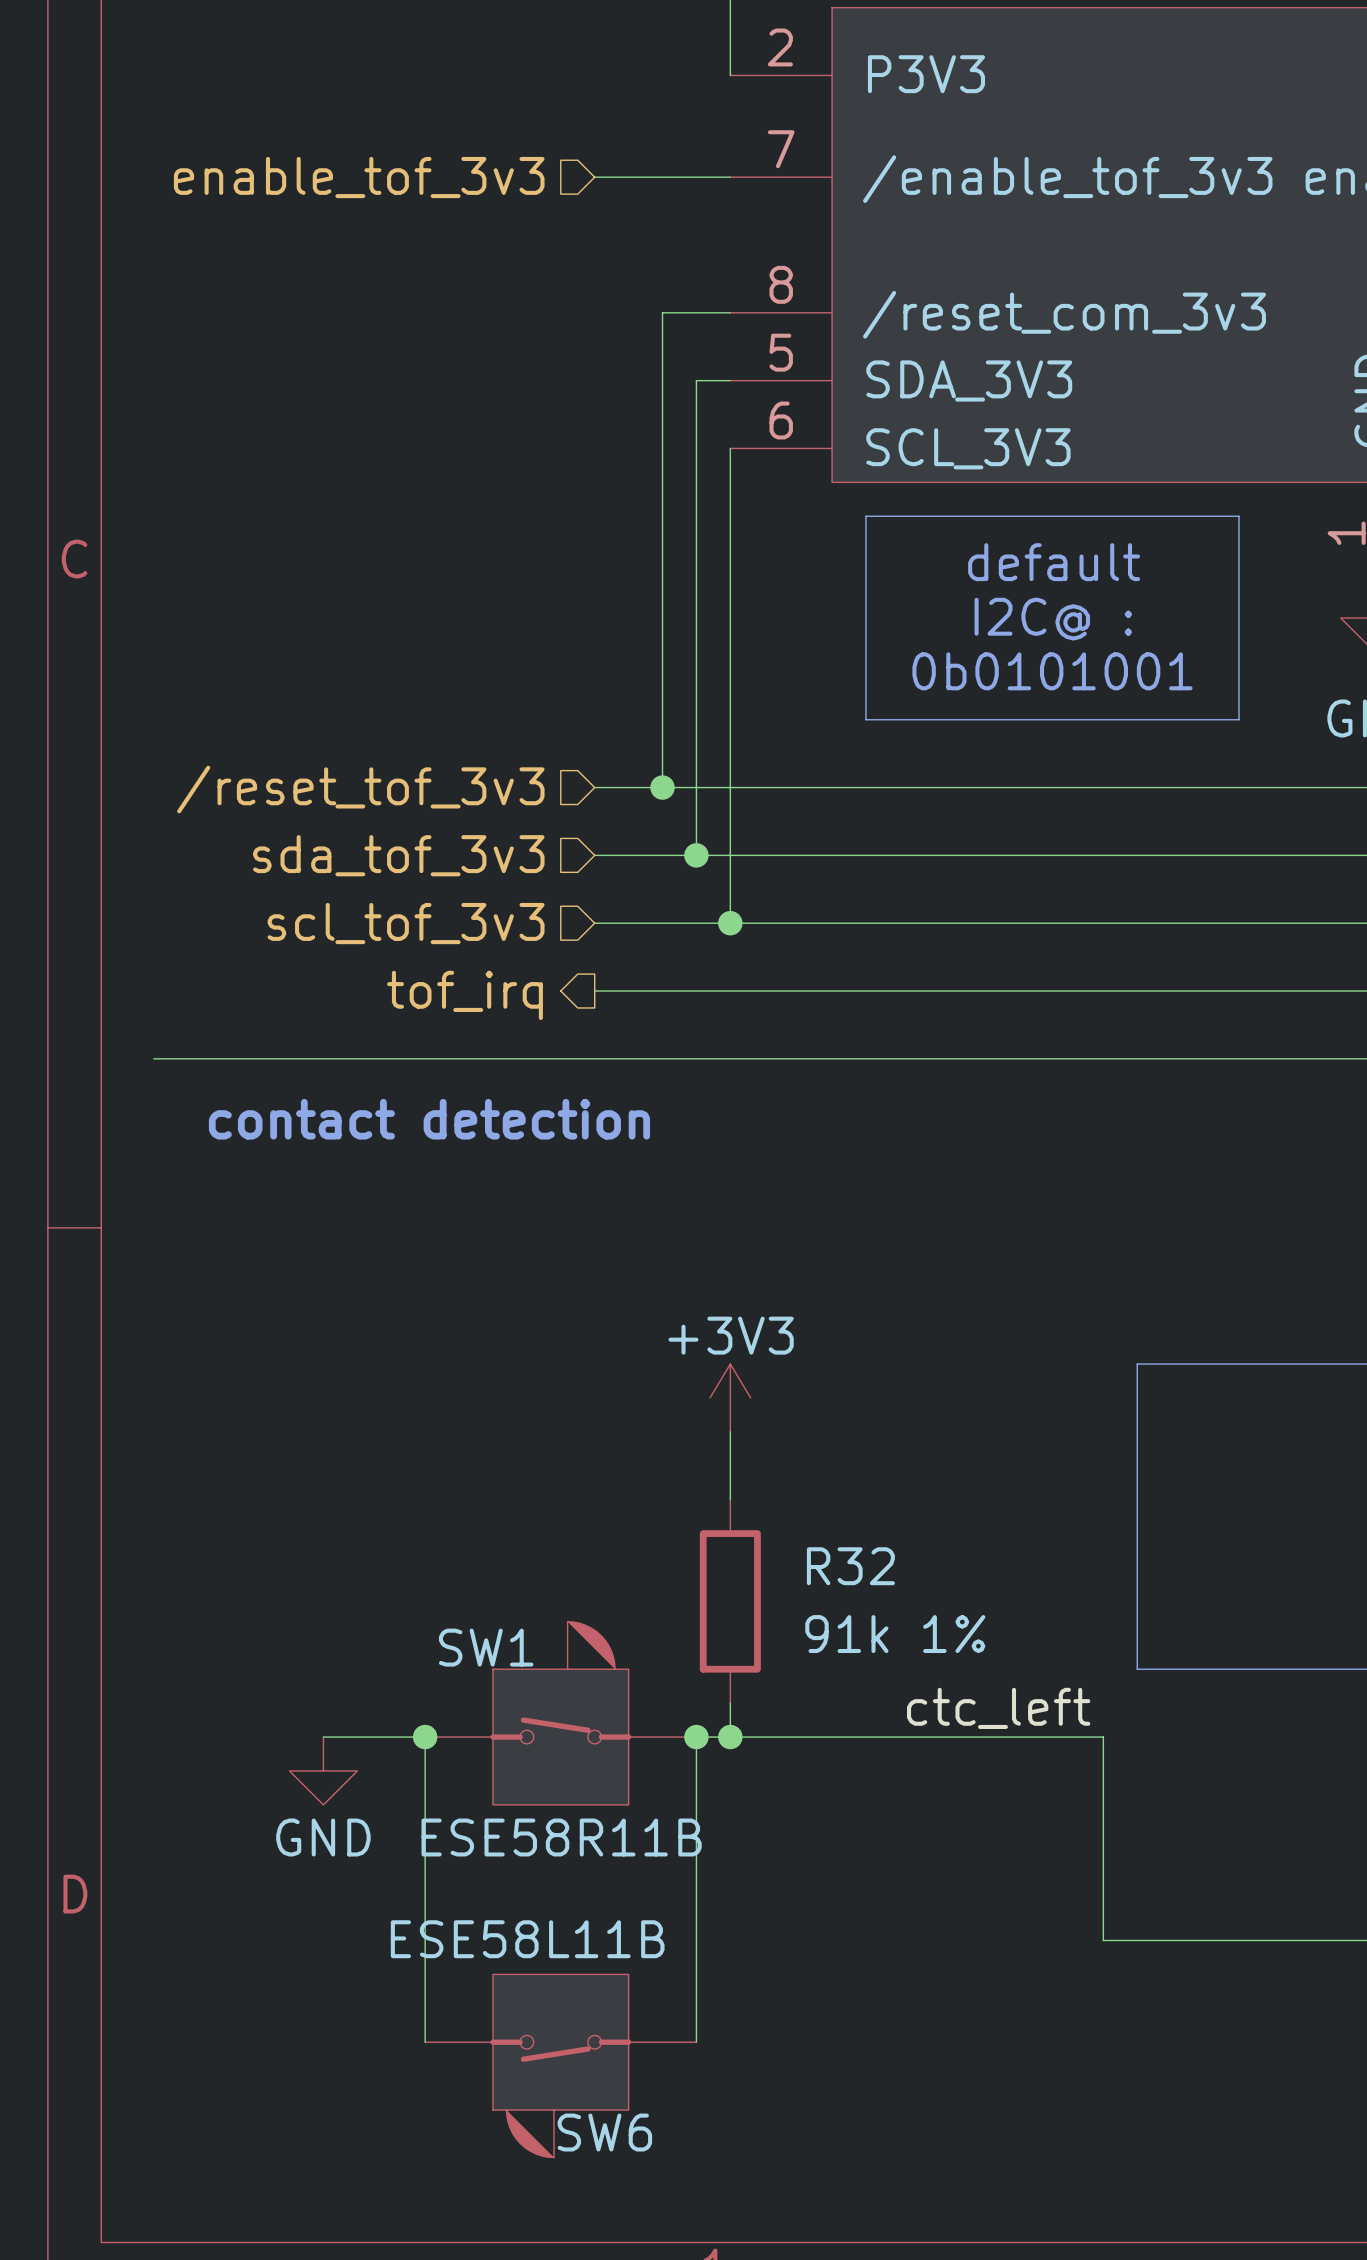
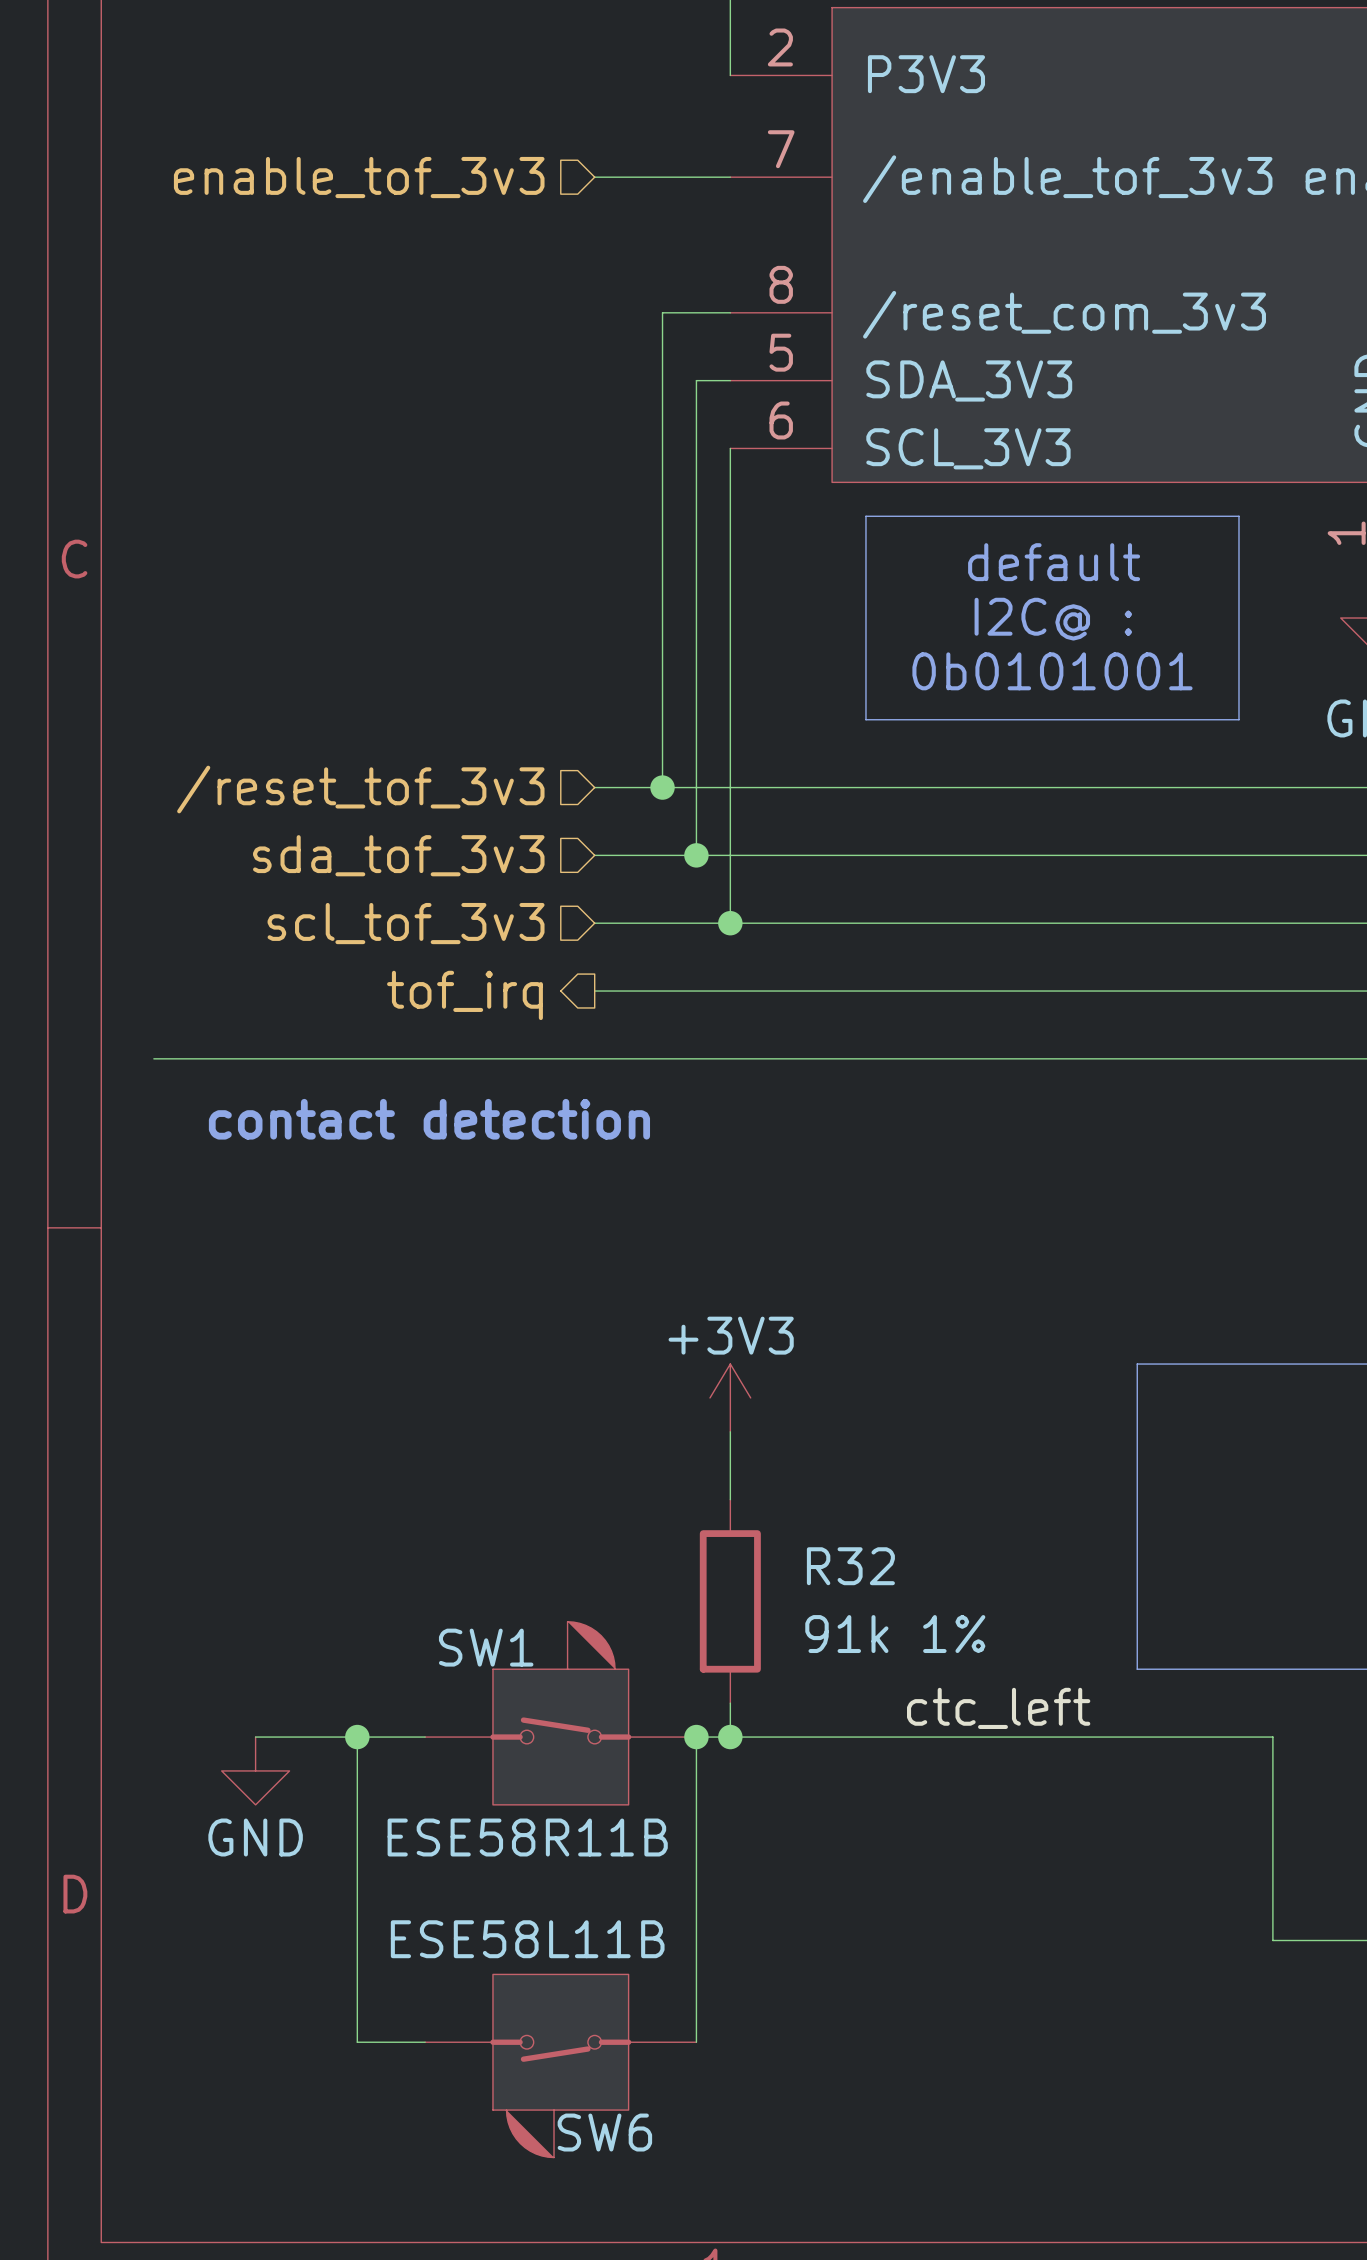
wire: none -> (255, 1737) (323, 1737)
wire: (425, 1737) (425, 2042) -> (357, 1737) (357, 2042) (425, 2042)
junction position: (425, 1737) -> (357, 1737)
wire: (1103, 1737) (1103, 1940) (1272, 1940) -> (1103, 1737) (1272, 1737) (1272, 1940)
power symbol position: GND (323, 1770) -> GND (255, 1770)
SW1 value position: ESE58R11B (561, 1837) -> ESE58R11B (527, 1837)

